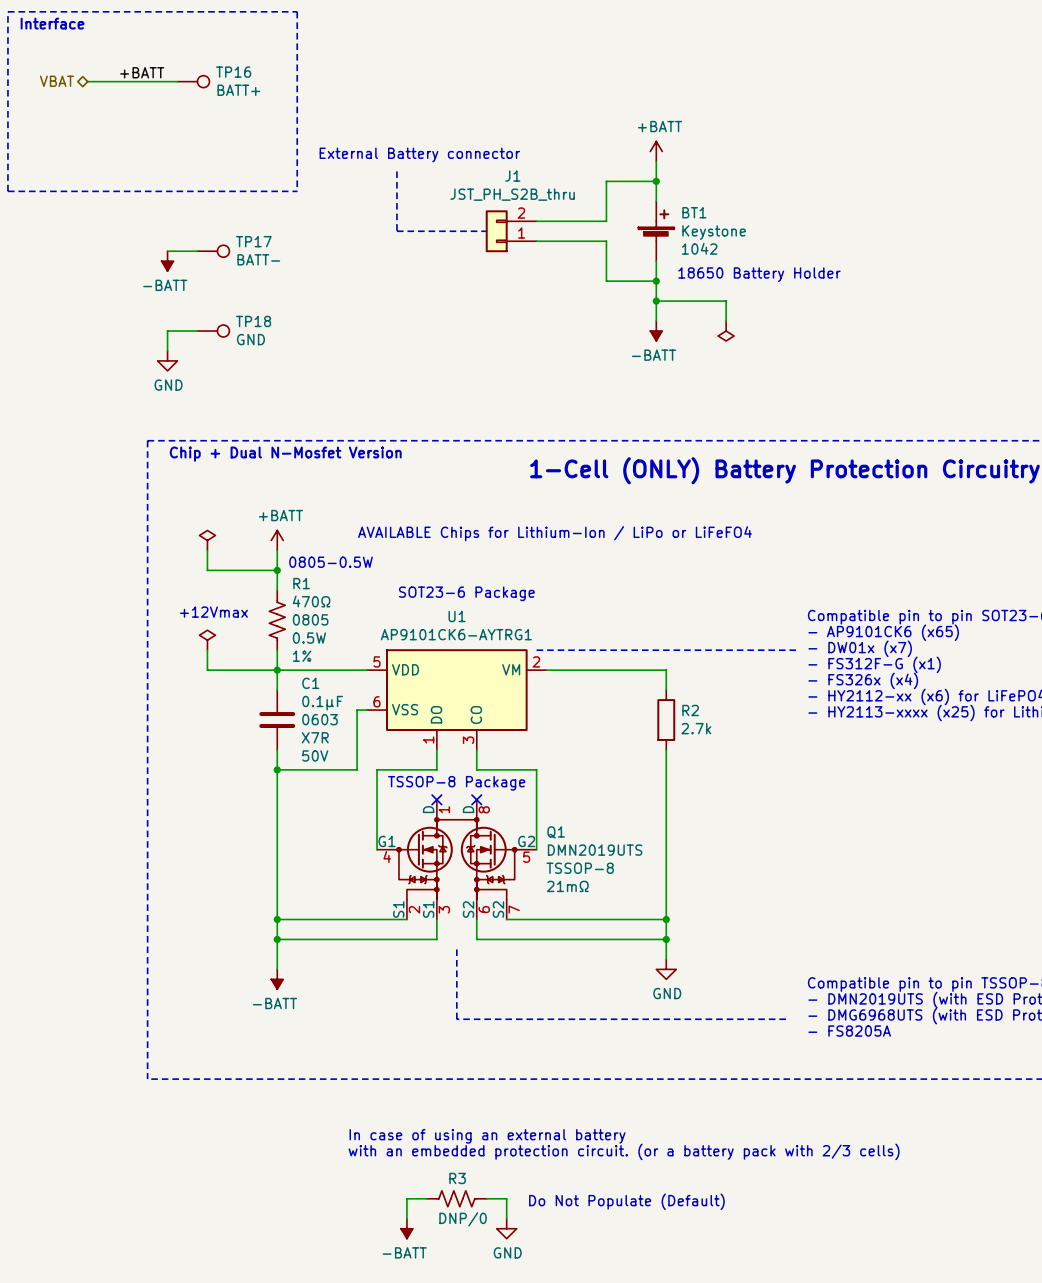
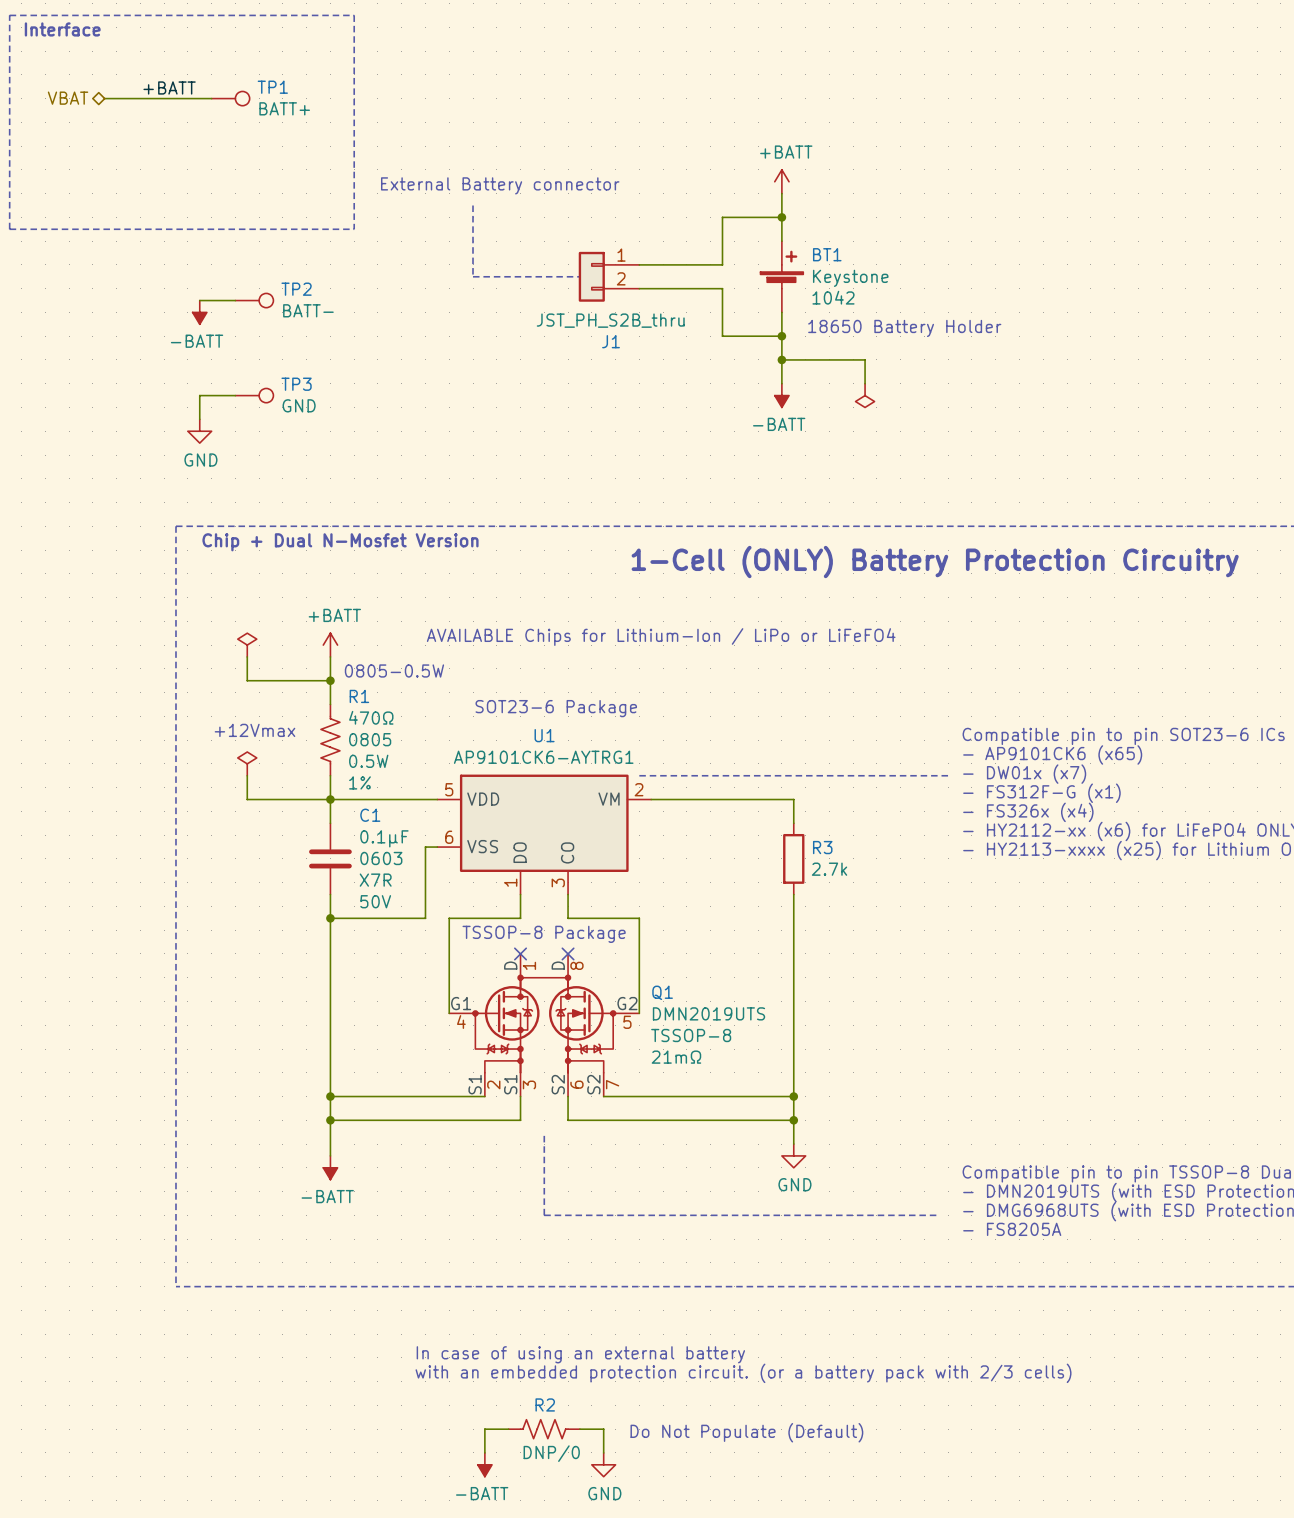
TP16 name: TP16 (233, 72) -> TP1 (272, 87)
J1 flip: as is (496, 231) -> up-down (591, 276)
TP17 name: TP17 (253, 241) -> TP2 (296, 289)
TP18 name: TP18 (253, 321) -> TP3 (296, 384)
R2 name: R2 (690, 710) -> R3 (822, 847)
R3 name: R3 (457, 1178) -> R2 (545, 1404)

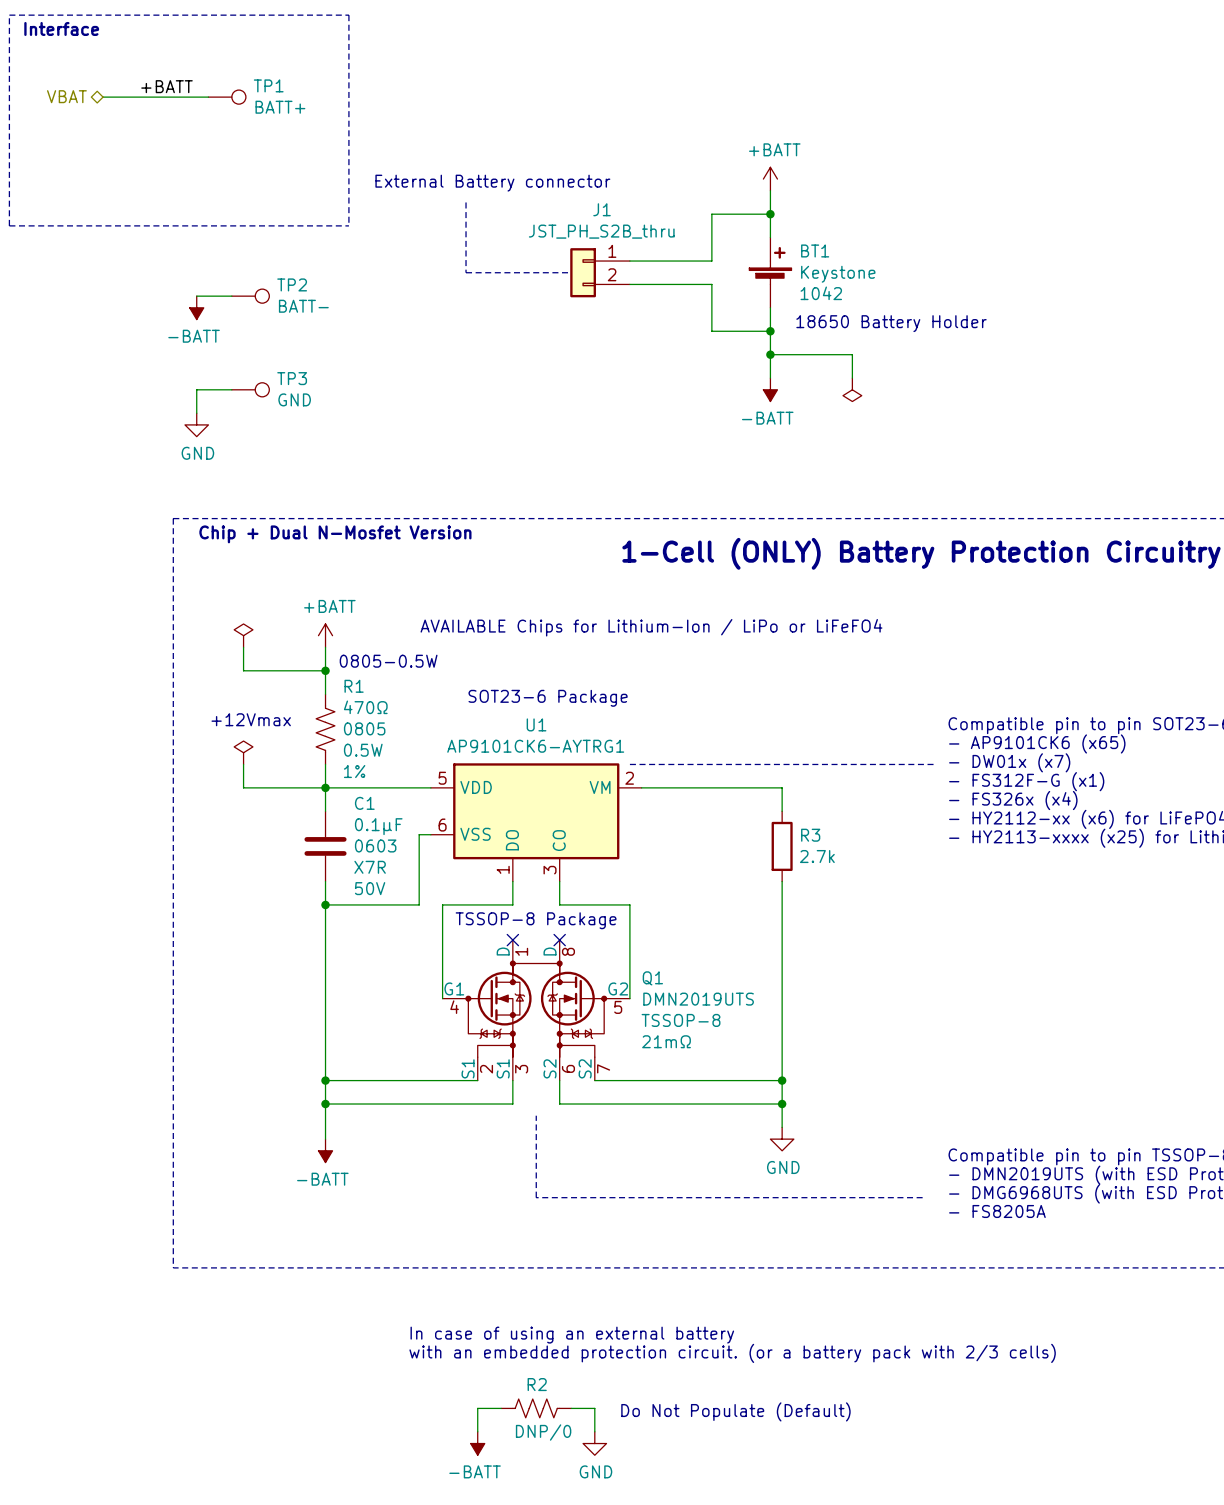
J1 value position: JST_PH_S2B_thru (610, 320) -> JST_PH_S2B_thru (601, 231)
J1 name position: J1 (611, 341) -> J1 (602, 209)

